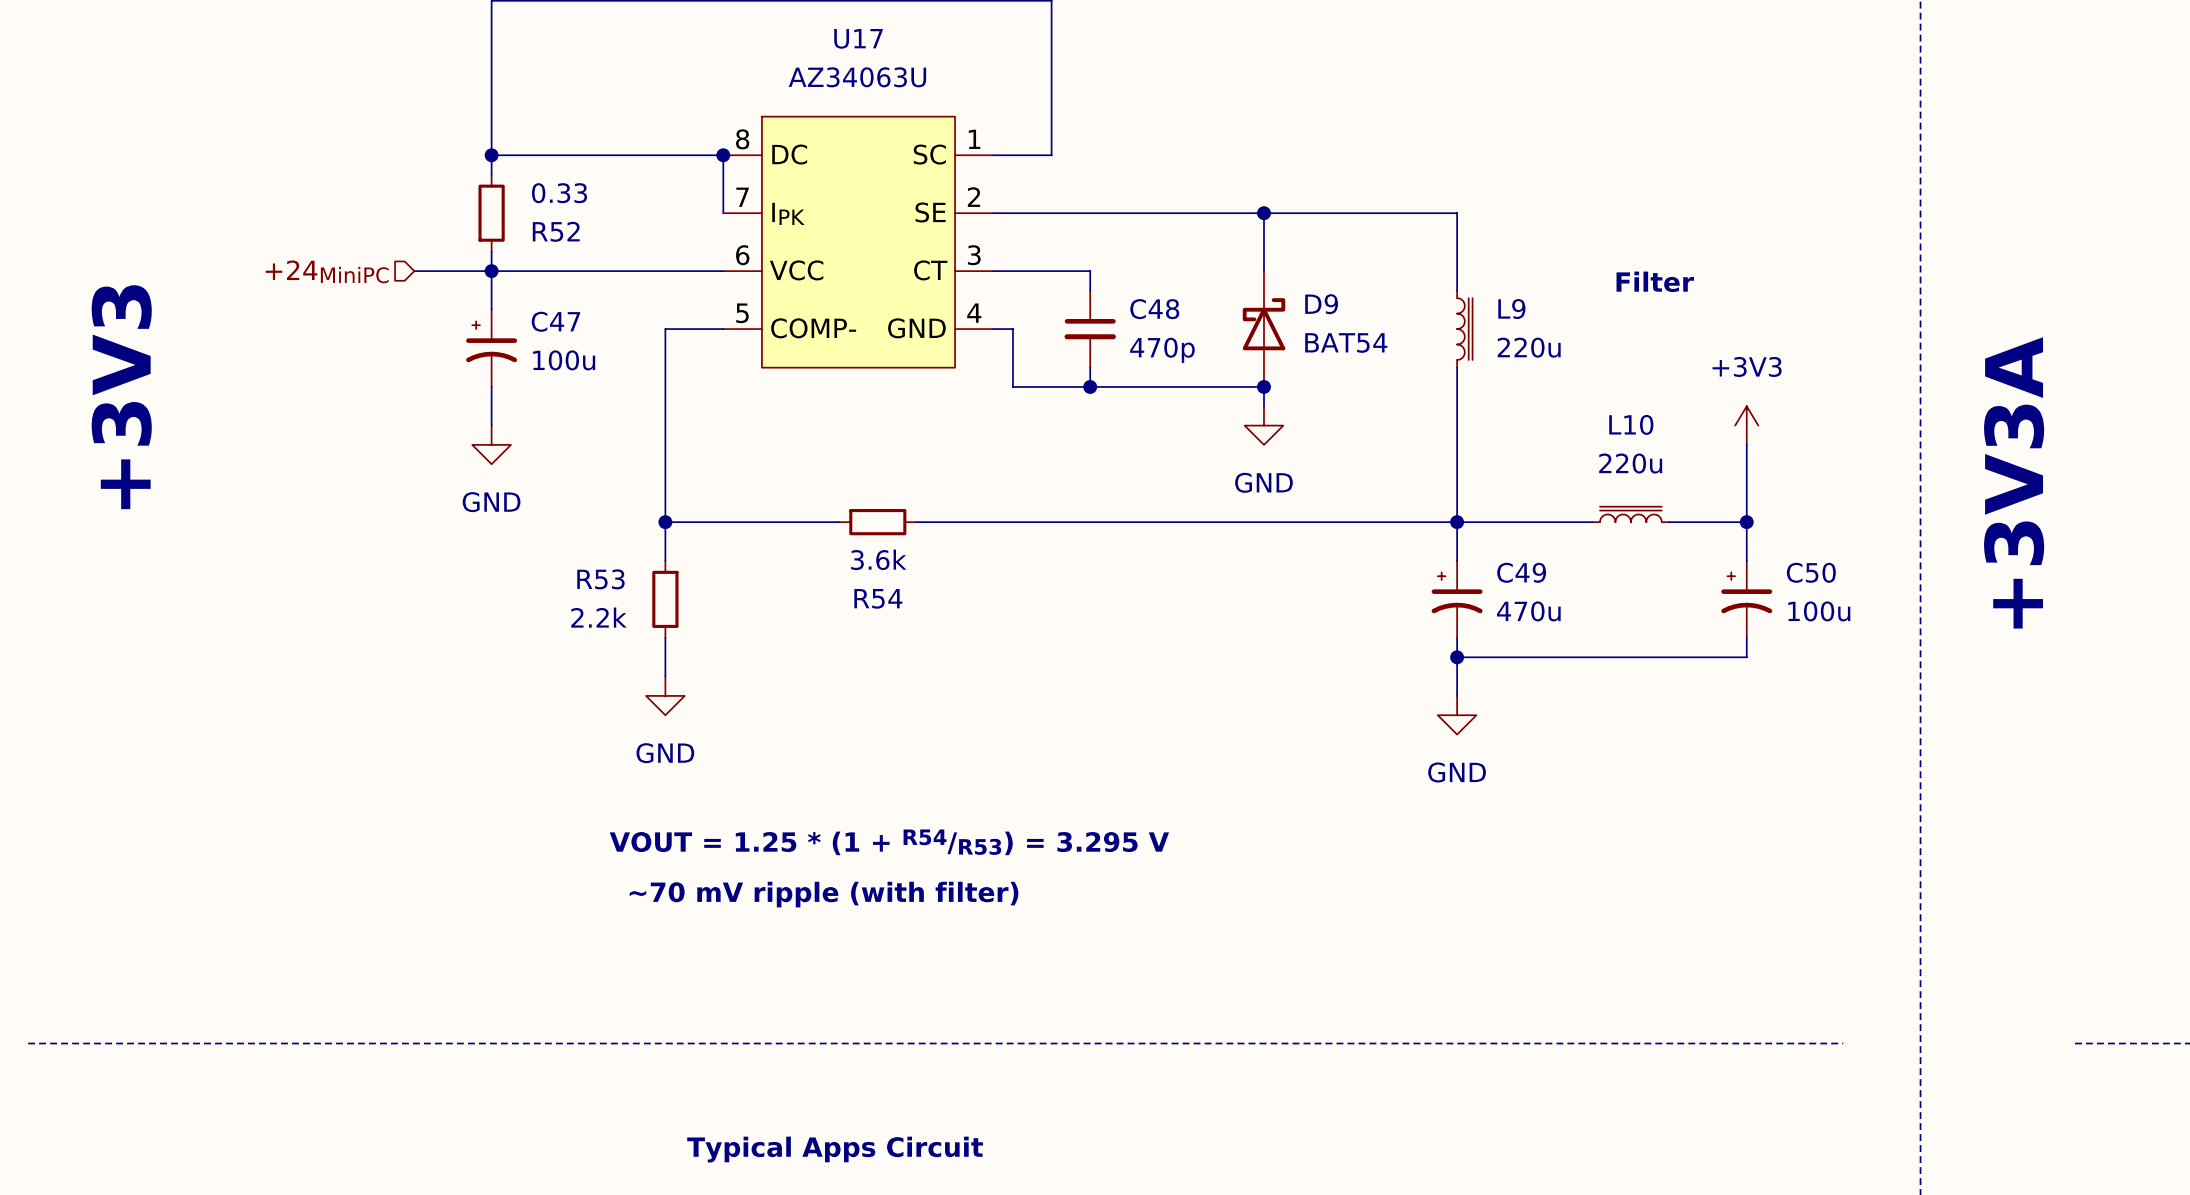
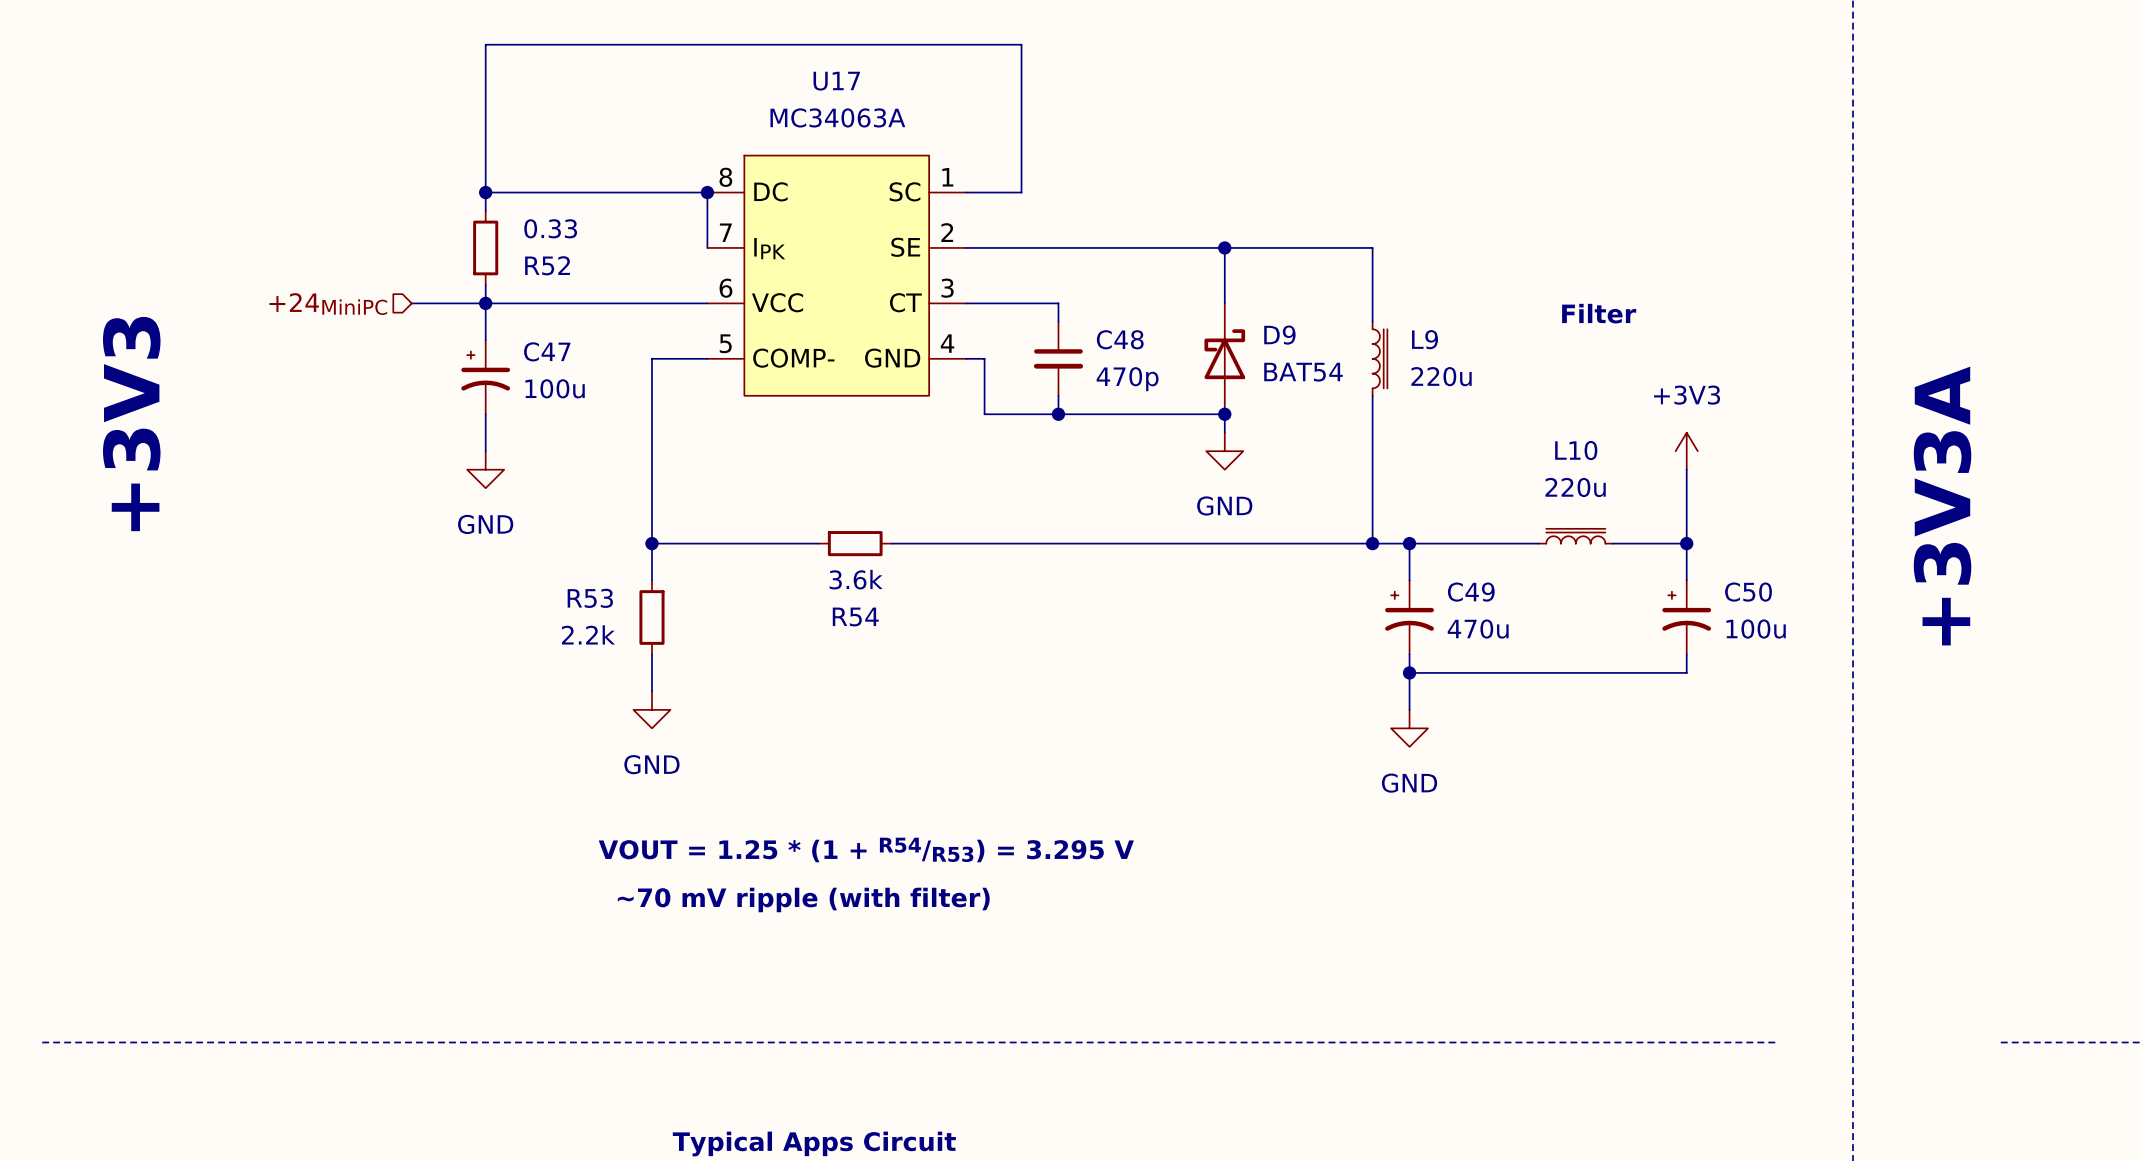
U17 value: AZ34063U (857, 77) -> MC34063A (837, 117)
wire: (1418, 213) (1457, 213) (1457, 290) -> (1372, 247) (1372, 321)
L9 position: (1464, 329) -> (1379, 358)
wire: (1457, 367) (1457, 522) -> (1372, 395) (1372, 543)
junction: none -> (1372, 543)

